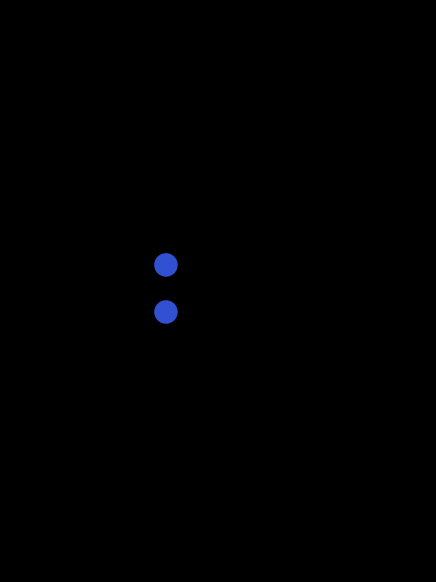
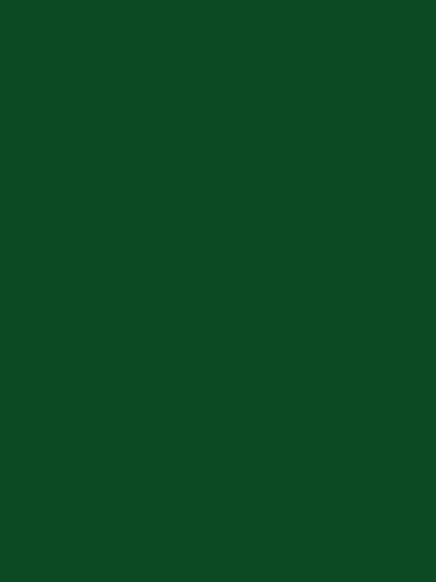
part: (165, 288) -> none

